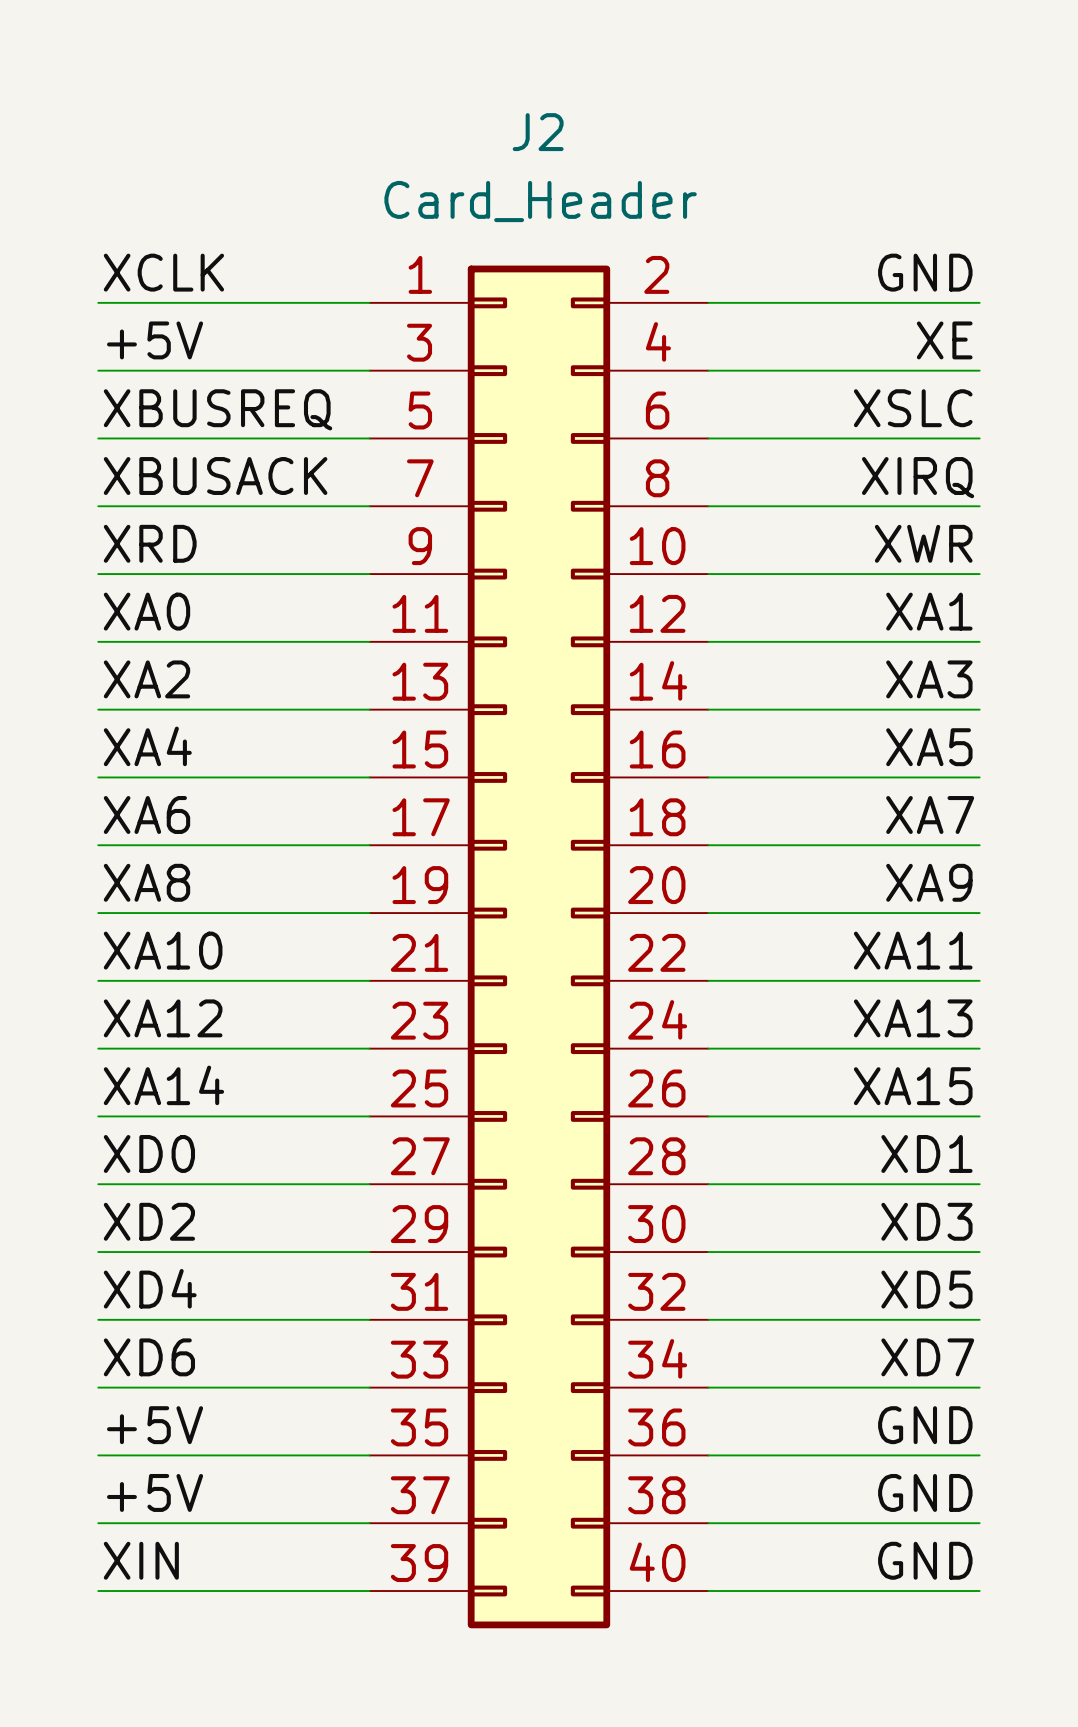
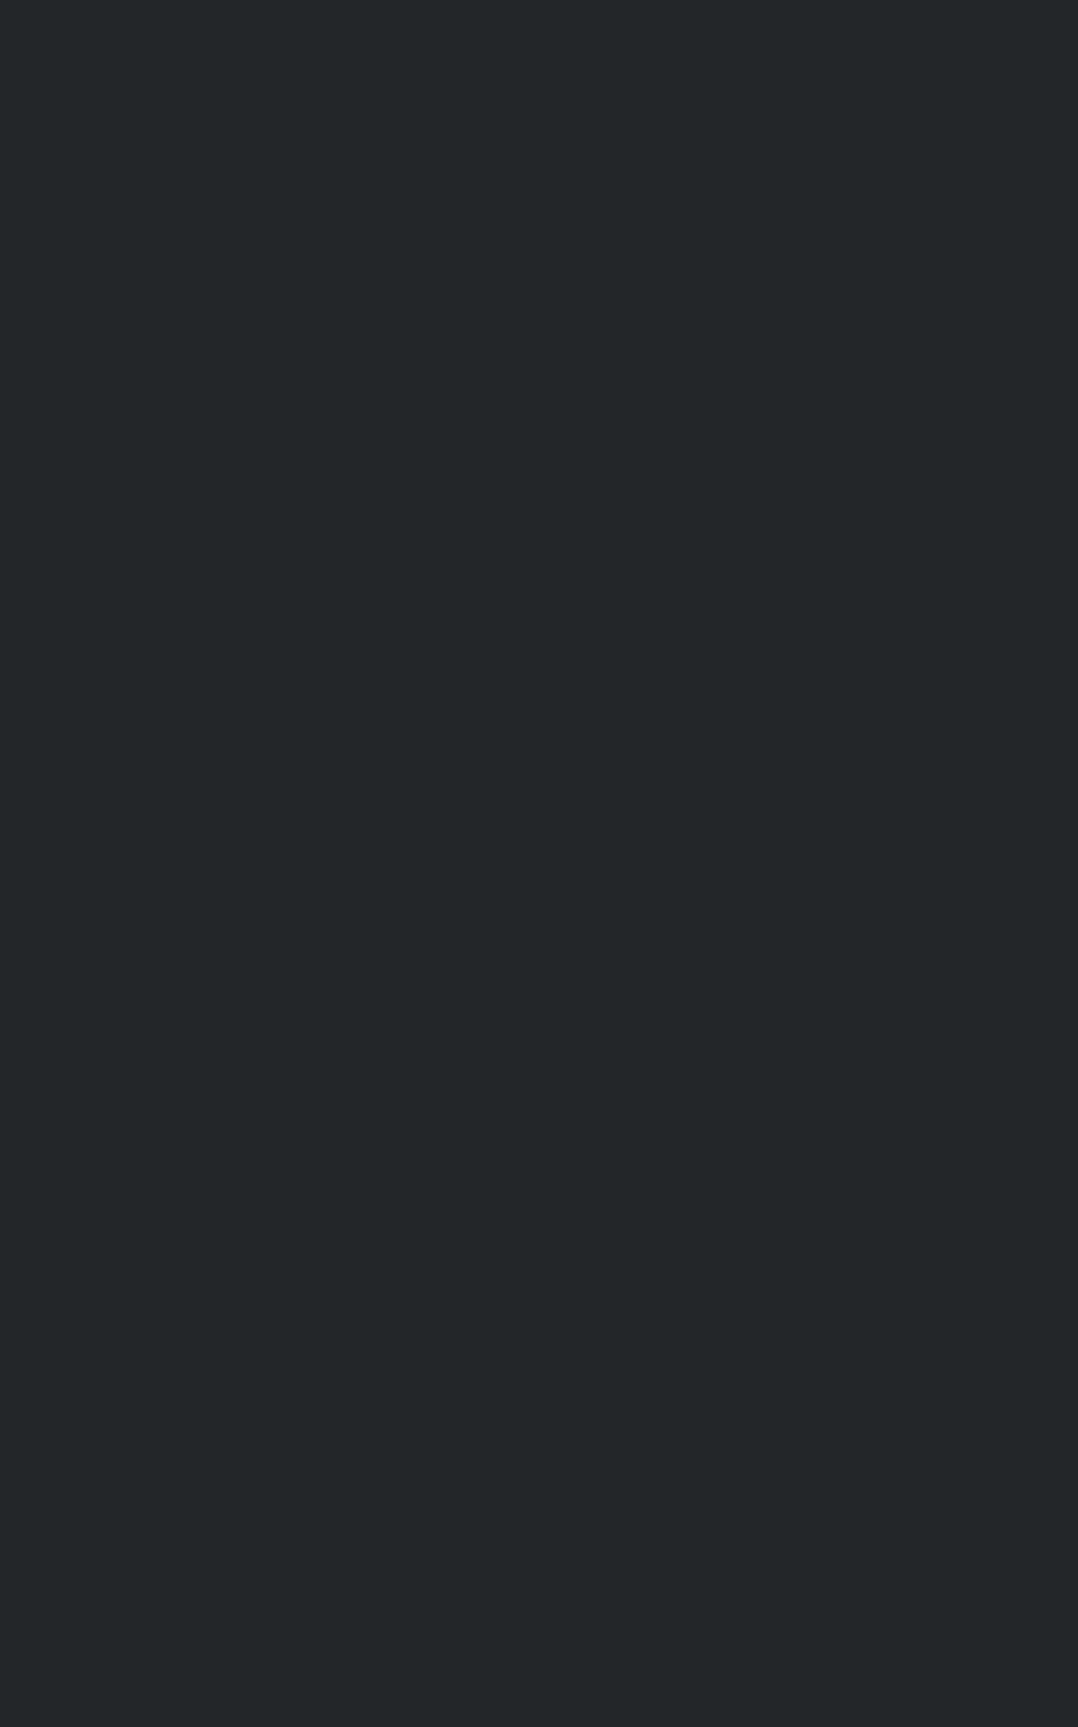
label: XCLK (163, 272) -> none
label: GND (925, 272) -> none
wire: (98, 302) (369, 302) -> none
wire: (708, 302) (979, 302) -> none
label: +5V (155, 340) -> none
label: XE (944, 340) -> none
wire: (98, 370) (369, 370) -> none
wire: (708, 370) (979, 370) -> none
label: XSLC (913, 408) -> none
label: XBUSREQ (218, 409) -> none
wire: (98, 438) (369, 438) -> none
wire: (708, 438) (979, 438) -> none
label: XBUSACK (215, 476) -> none
label: XIRQ (918, 477) -> none
wire: (98, 506) (369, 506) -> none
wire: (708, 506) (979, 506) -> none
label: XRD (150, 543) -> none
label: XWR (923, 543) -> none
wire: (98, 574) (369, 574) -> none
wire: (708, 574) (979, 574) -> none
label: XA0 (146, 611) -> none
label: XA1 (929, 611) -> none
wire: (98, 641) (369, 641) -> none
wire: (708, 641) (979, 641) -> none
label: XA2 (146, 679) -> none
label: XA3 (929, 679) -> none
wire: (98, 709) (369, 709) -> none
wire: (708, 709) (979, 709) -> none
label: XA4 (147, 746) -> none
label: XA5 (929, 747) -> none
wire: (98, 777) (369, 777) -> none
wire: (708, 777) (979, 777) -> none
label: XA6 (146, 814) -> none
label: XA7 (930, 814) -> none
wire: (98, 845) (369, 845) -> none
wire: (708, 845) (979, 845) -> none
label: XA8 (146, 882) -> none
label: XA9 (929, 882) -> none
wire: (98, 913) (369, 913) -> none
wire: (708, 913) (979, 913) -> none
J2: Card_Header (538, 946) -> none
label: XA10 (163, 950) -> none
label: XA11 (913, 950) -> none
wire: (98, 980) (369, 980) -> none
wire: (708, 980) (979, 980) -> none
label: XA12 (163, 1018) -> none
label: XA13 (913, 1018) -> none
wire: (98, 1048) (369, 1048) -> none
wire: (708, 1048) (979, 1048) -> none
label: XA14 (163, 1085) -> none
label: XA15 (913, 1086) -> none
wire: (98, 1116) (369, 1116) -> none
wire: (708, 1116) (979, 1116) -> none
label: XD0 (149, 1153) -> none
label: XD1 (926, 1153) -> none
wire: (98, 1184) (369, 1184) -> none
wire: (708, 1184) (979, 1184) -> none
label: XD2 (149, 1221) -> none
label: XD3 (926, 1221) -> none
wire: (98, 1252) (369, 1252) -> none
wire: (708, 1252) (979, 1252) -> none
label: XD4 (150, 1288) -> none
label: XD5 (926, 1289) -> none
wire: (98, 1319) (369, 1319) -> none
wire: (708, 1319) (979, 1319) -> none
label: XD6 (149, 1357) -> none
label: XD7 (927, 1357) -> none
wire: (98, 1387) (369, 1387) -> none
wire: (708, 1387) (979, 1387) -> none
label: +5V (155, 1425) -> none
label: GND (925, 1425) -> none
wire: (98, 1455) (369, 1455) -> none
wire: (708, 1455) (979, 1455) -> none
label: +5V (155, 1492) -> none
label: GND (925, 1492) -> none
wire: (98, 1523) (369, 1523) -> none
wire: (708, 1523) (979, 1523) -> none
label: XIN (141, 1560) -> none
label: GND (925, 1560) -> none
wire: (98, 1591) (369, 1591) -> none
wire: (708, 1591) (979, 1591) -> none

